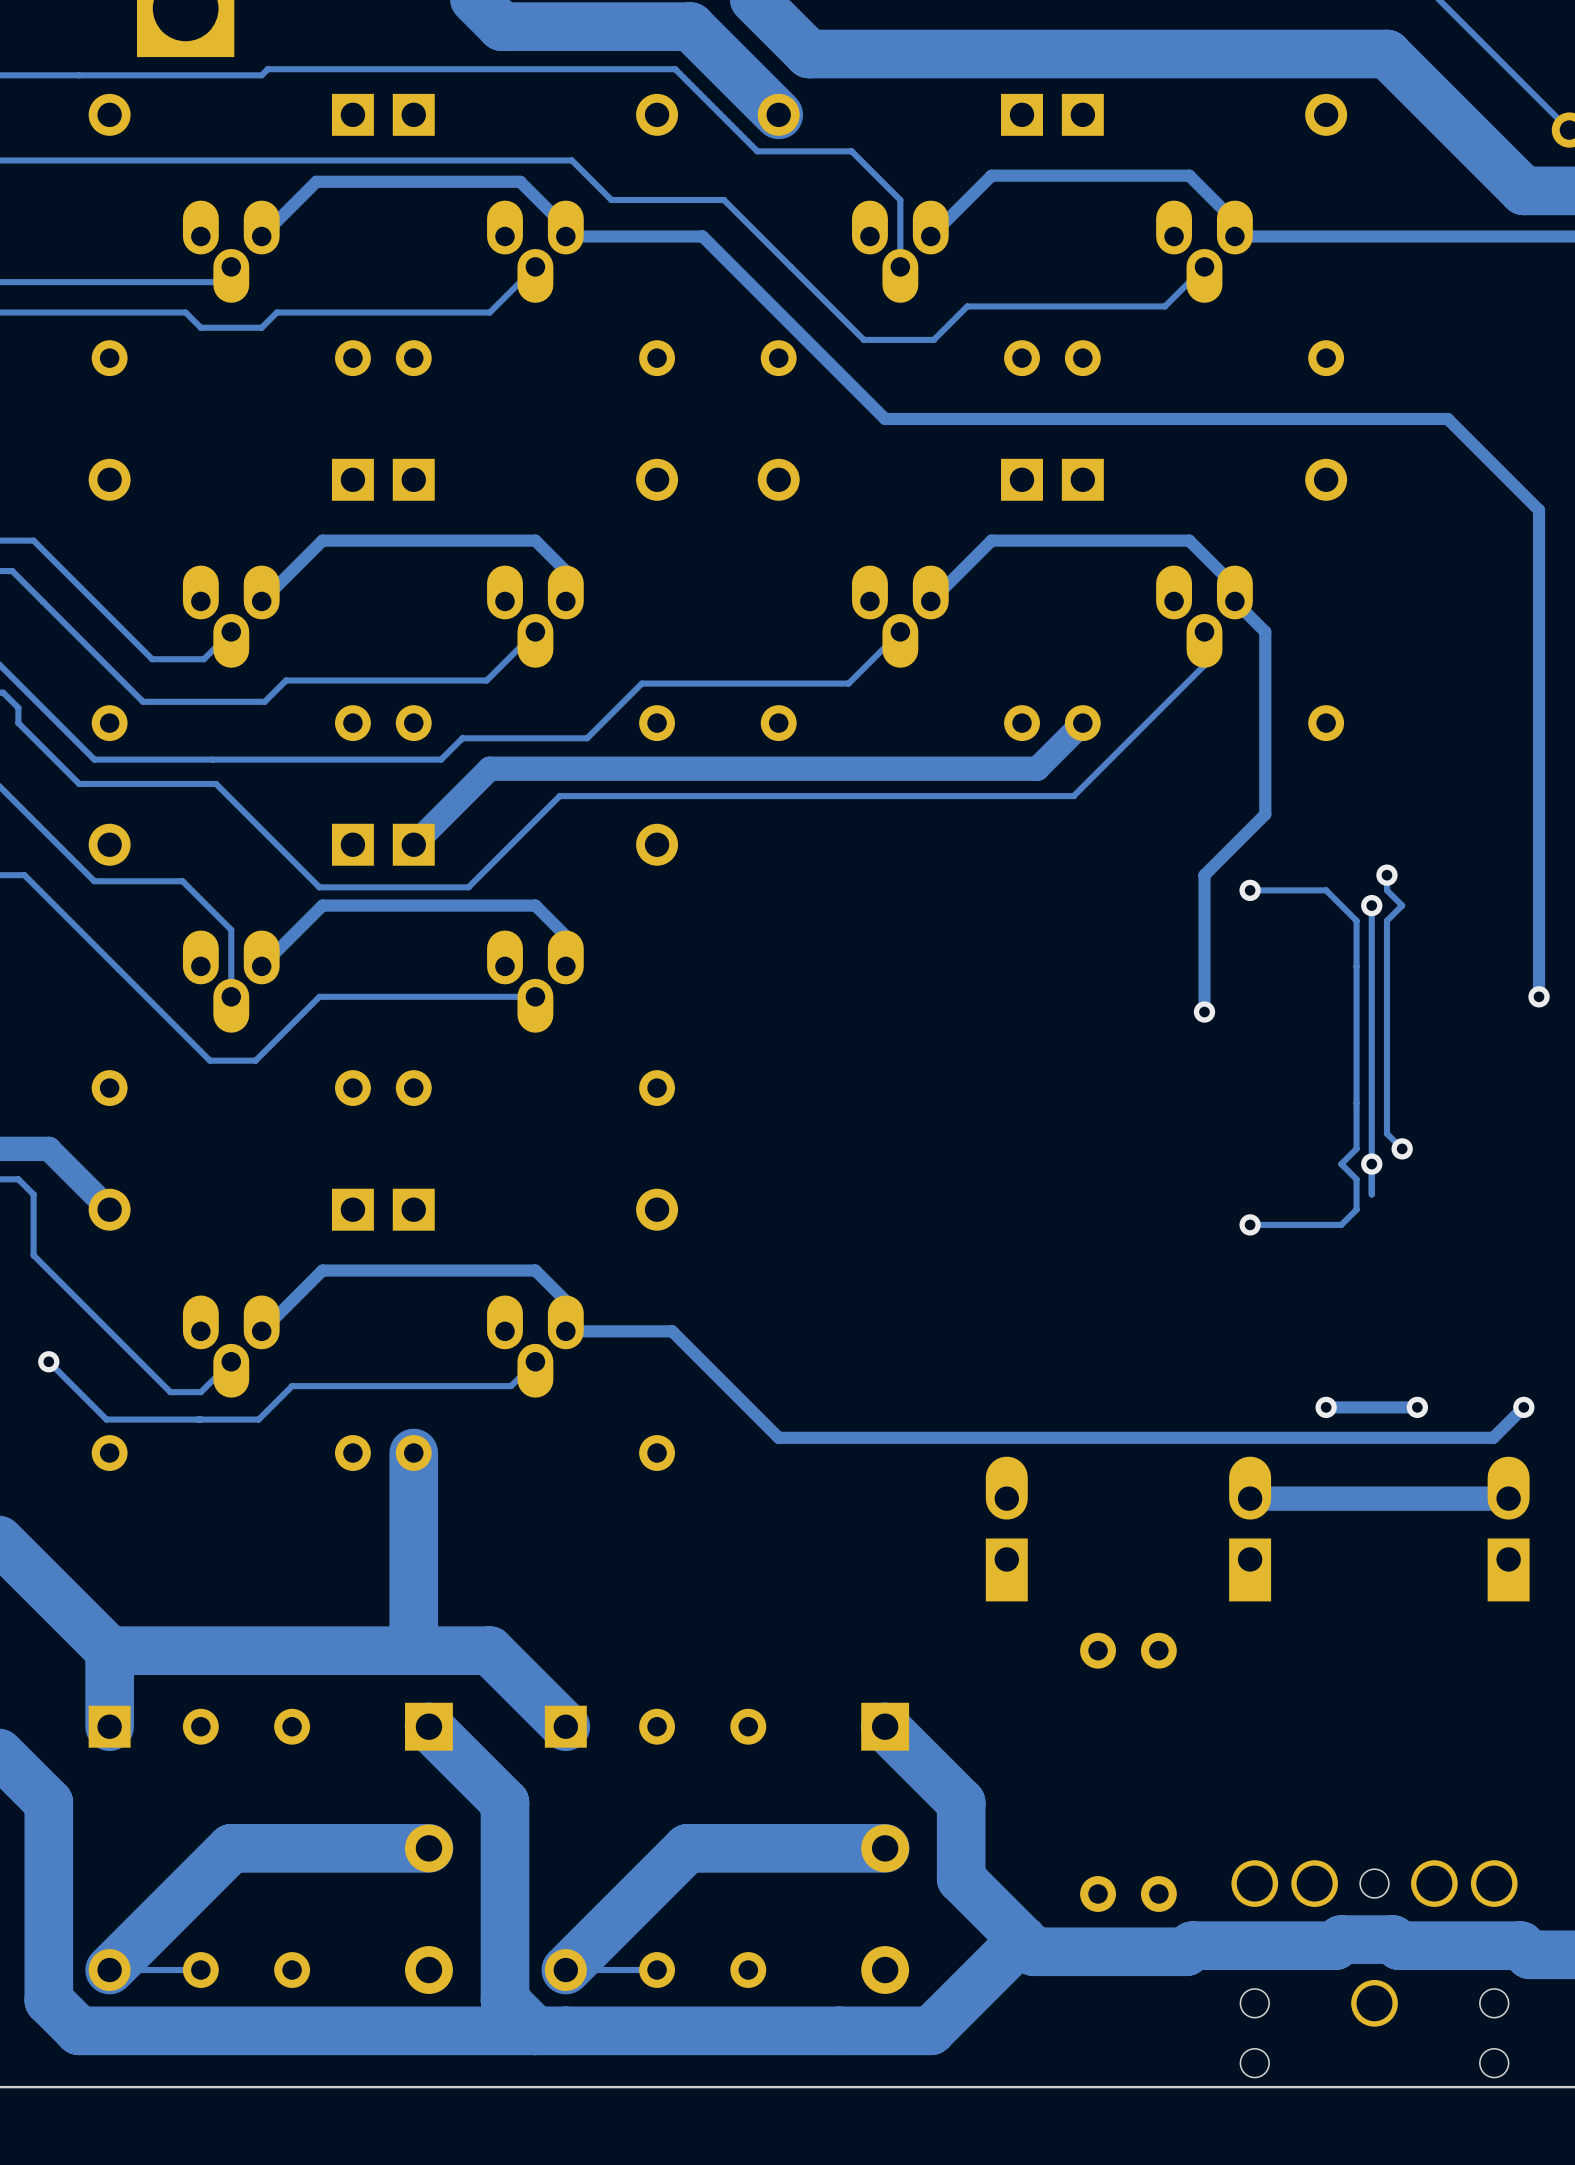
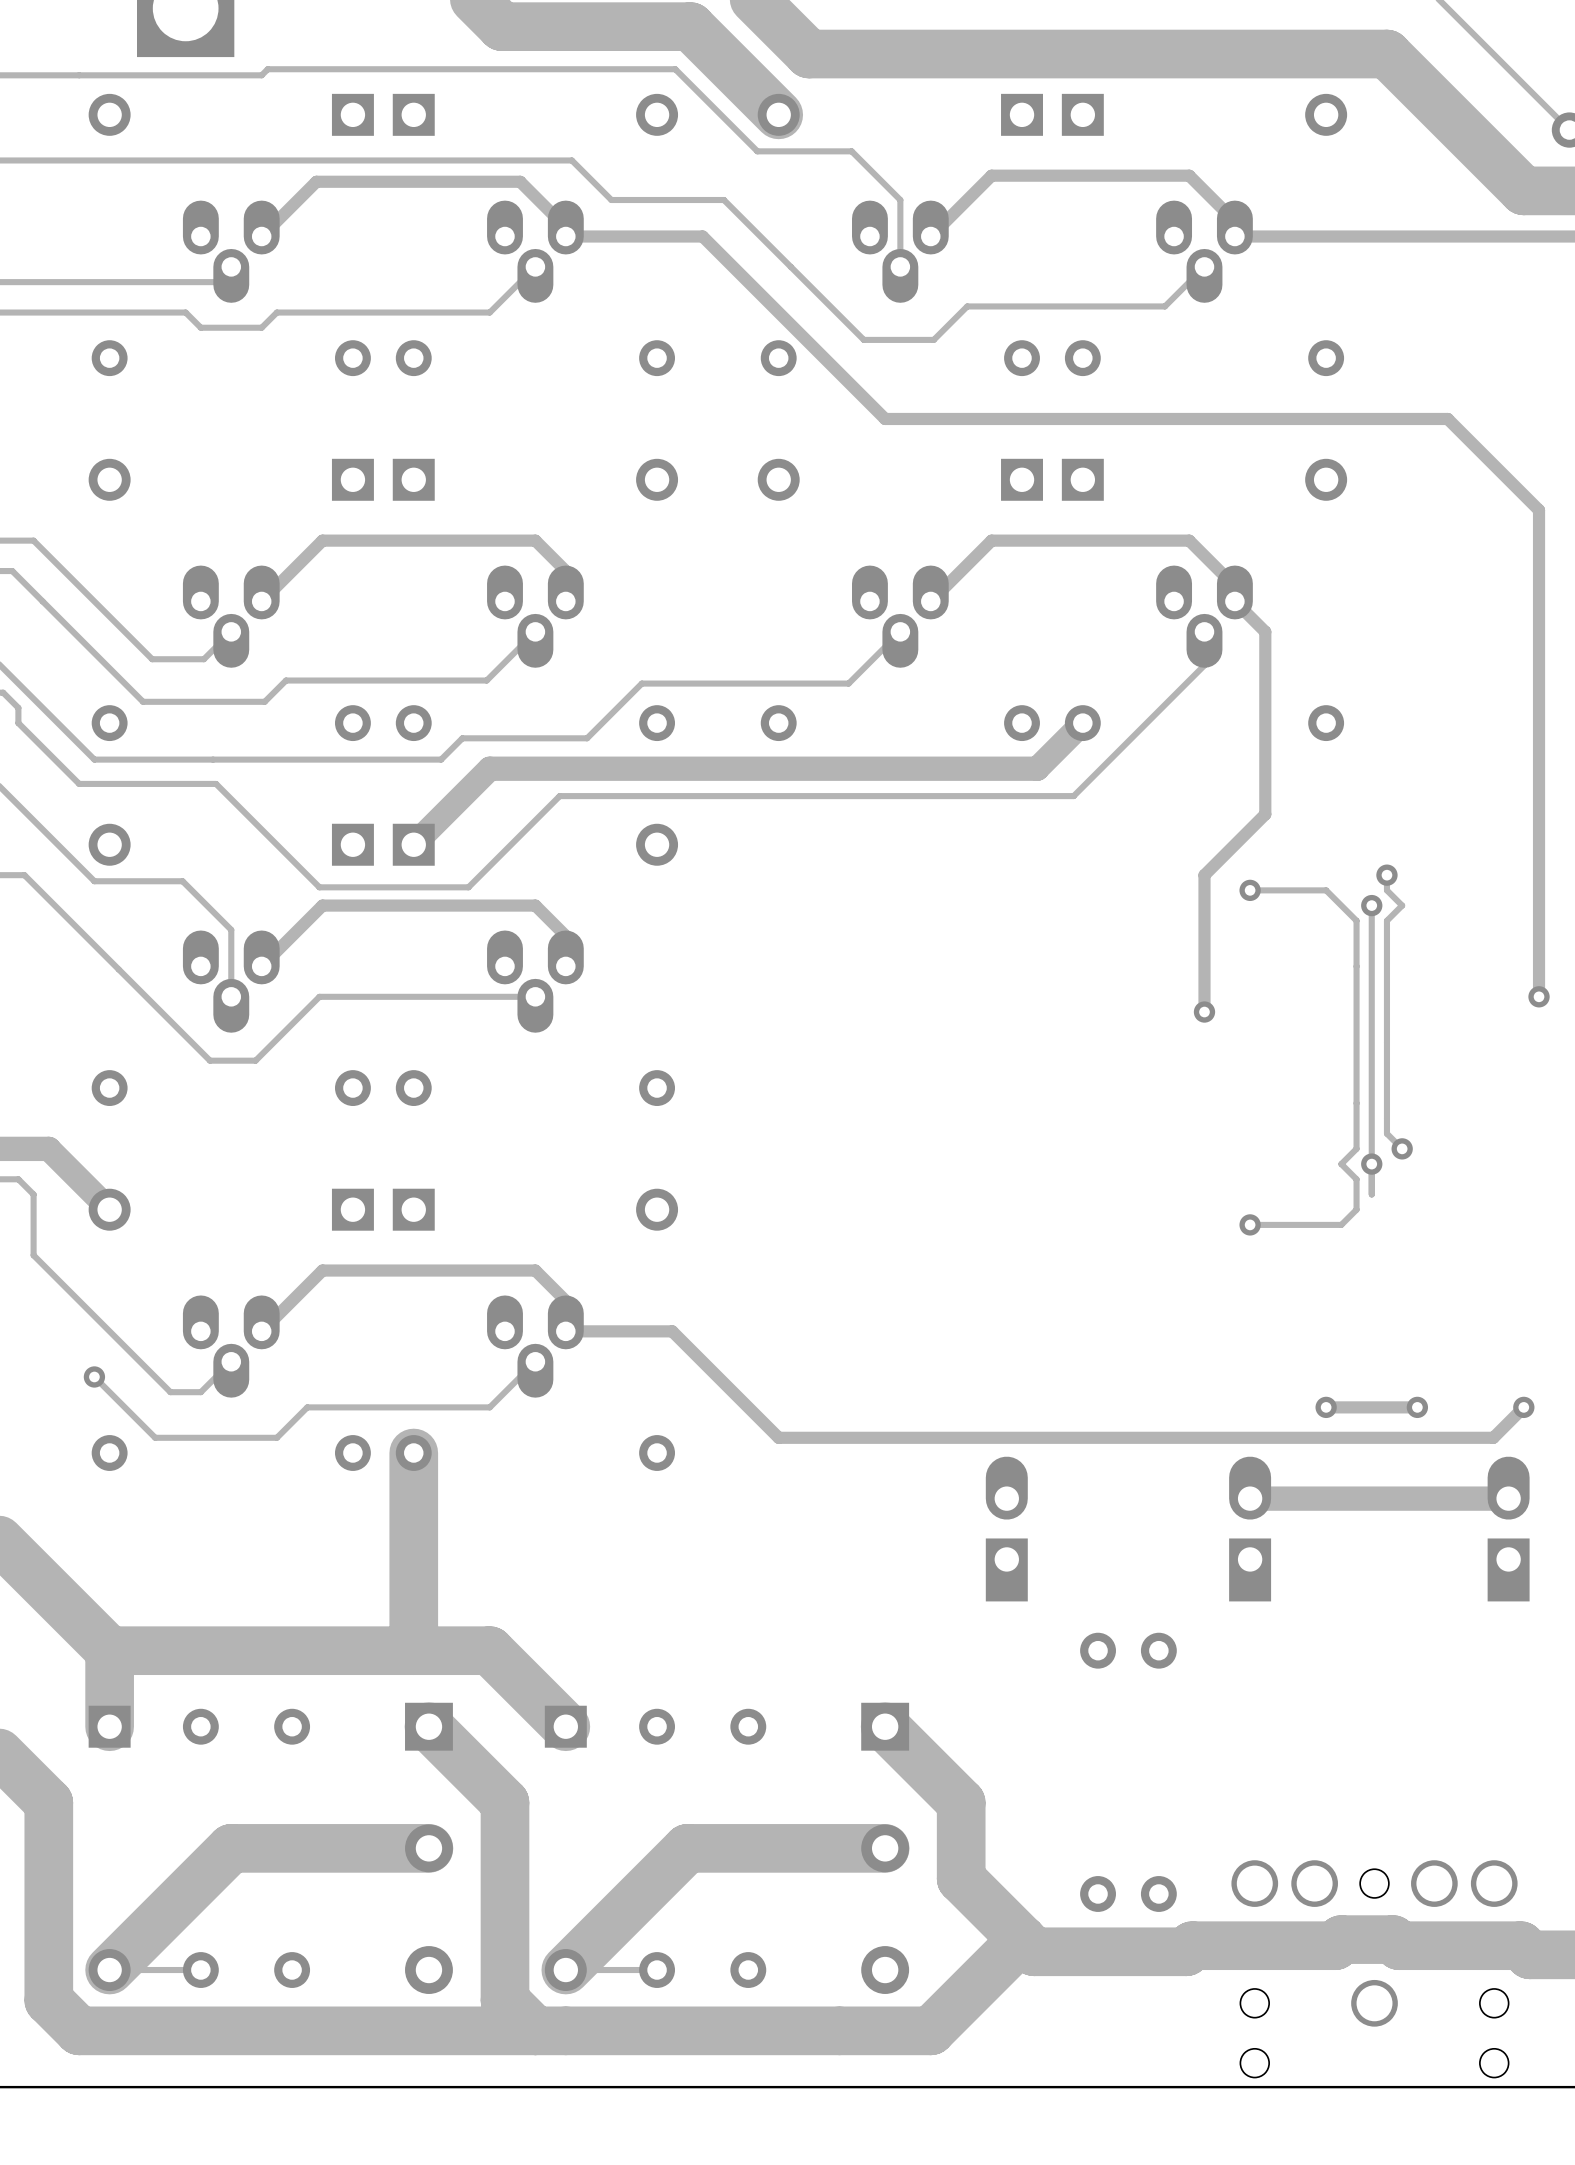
track: (48, 1361) (106, 1419) (258, 1419) (292, 1386) (511, 1386) -> (94, 1376) (155, 1437) (276, 1437) (307, 1407) (489, 1407) (511, 1386)
via position: (48, 1361) -> (94, 1376)

